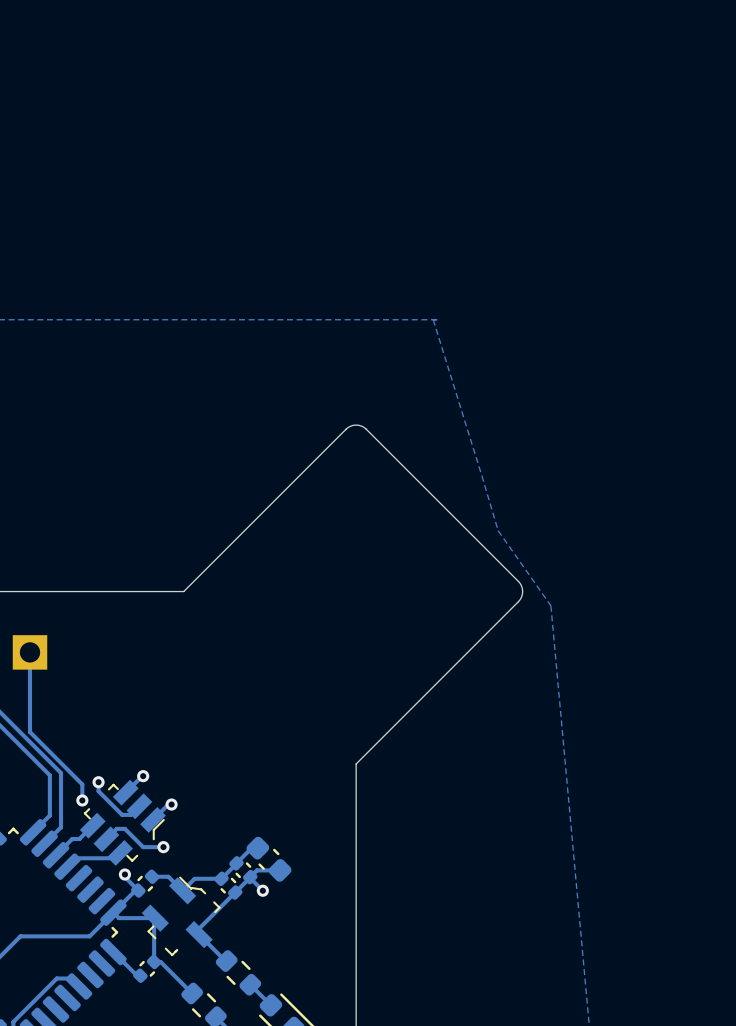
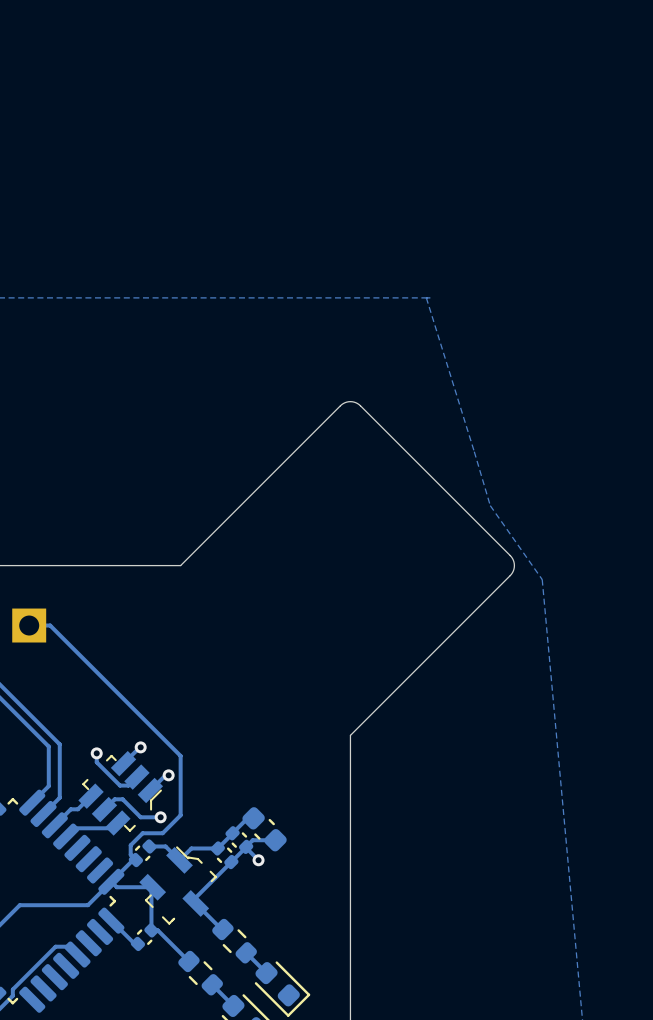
track: (30, 652) (30, 732) (82, 784) (82, 800) -> (29, 625) (50, 625) (180, 755) (180, 815) (162, 833) (142, 833) (130, 845) (130, 854)
via: (82, 800) -> none
track: (124, 874) (124, 877) (133, 885) -> none
via: (124, 874) -> none

